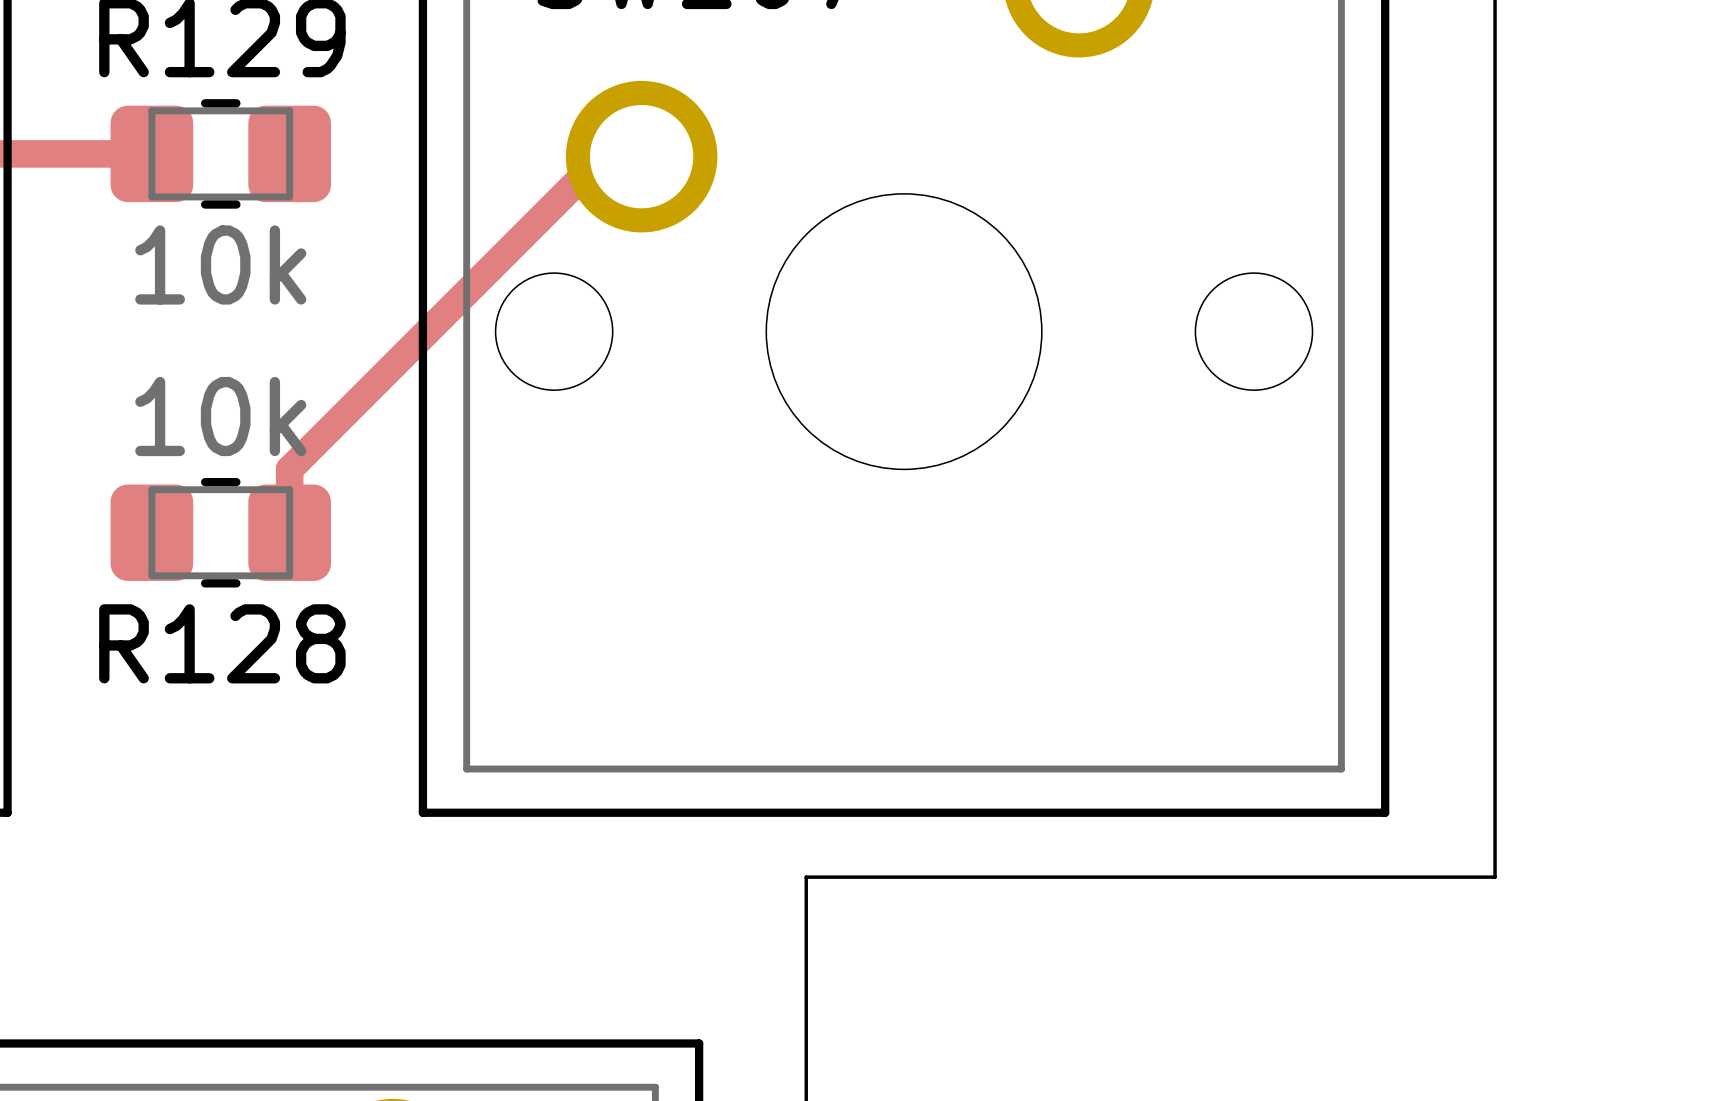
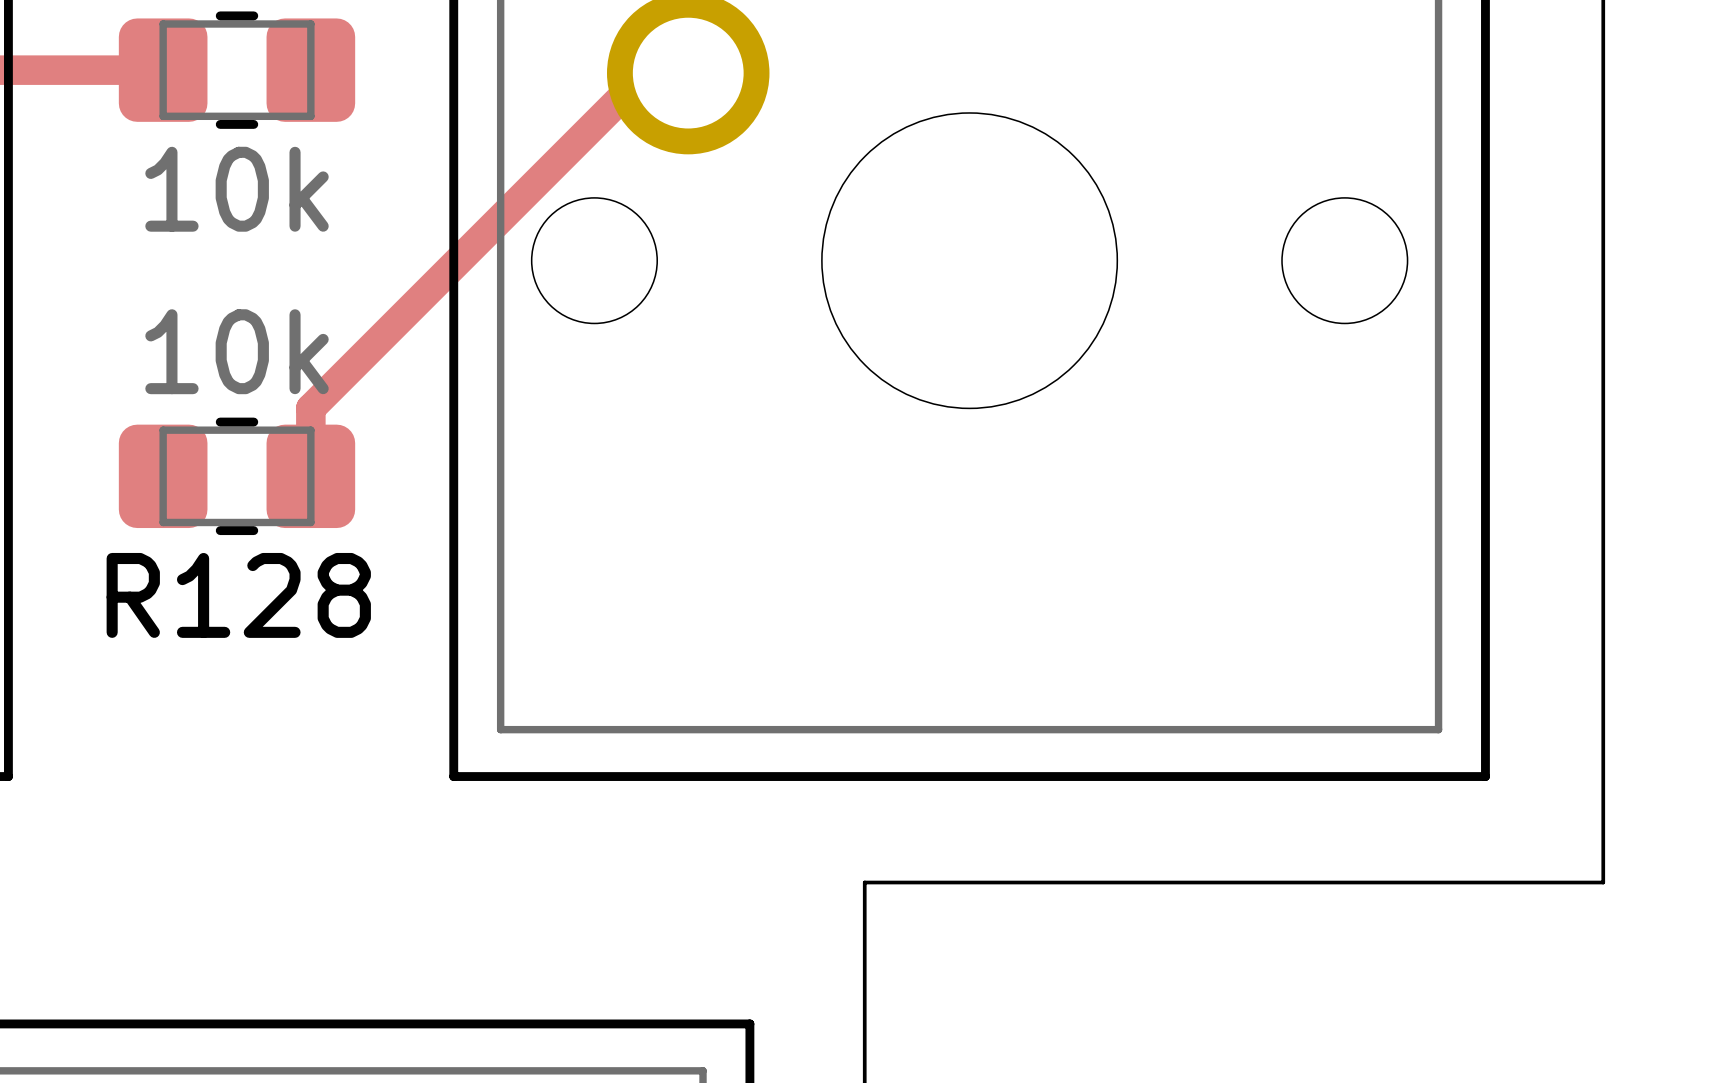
board edge: (1495, 877) (806, 877) (806, 911) -> (1603, 845) (1603, 882) (864, 882)

